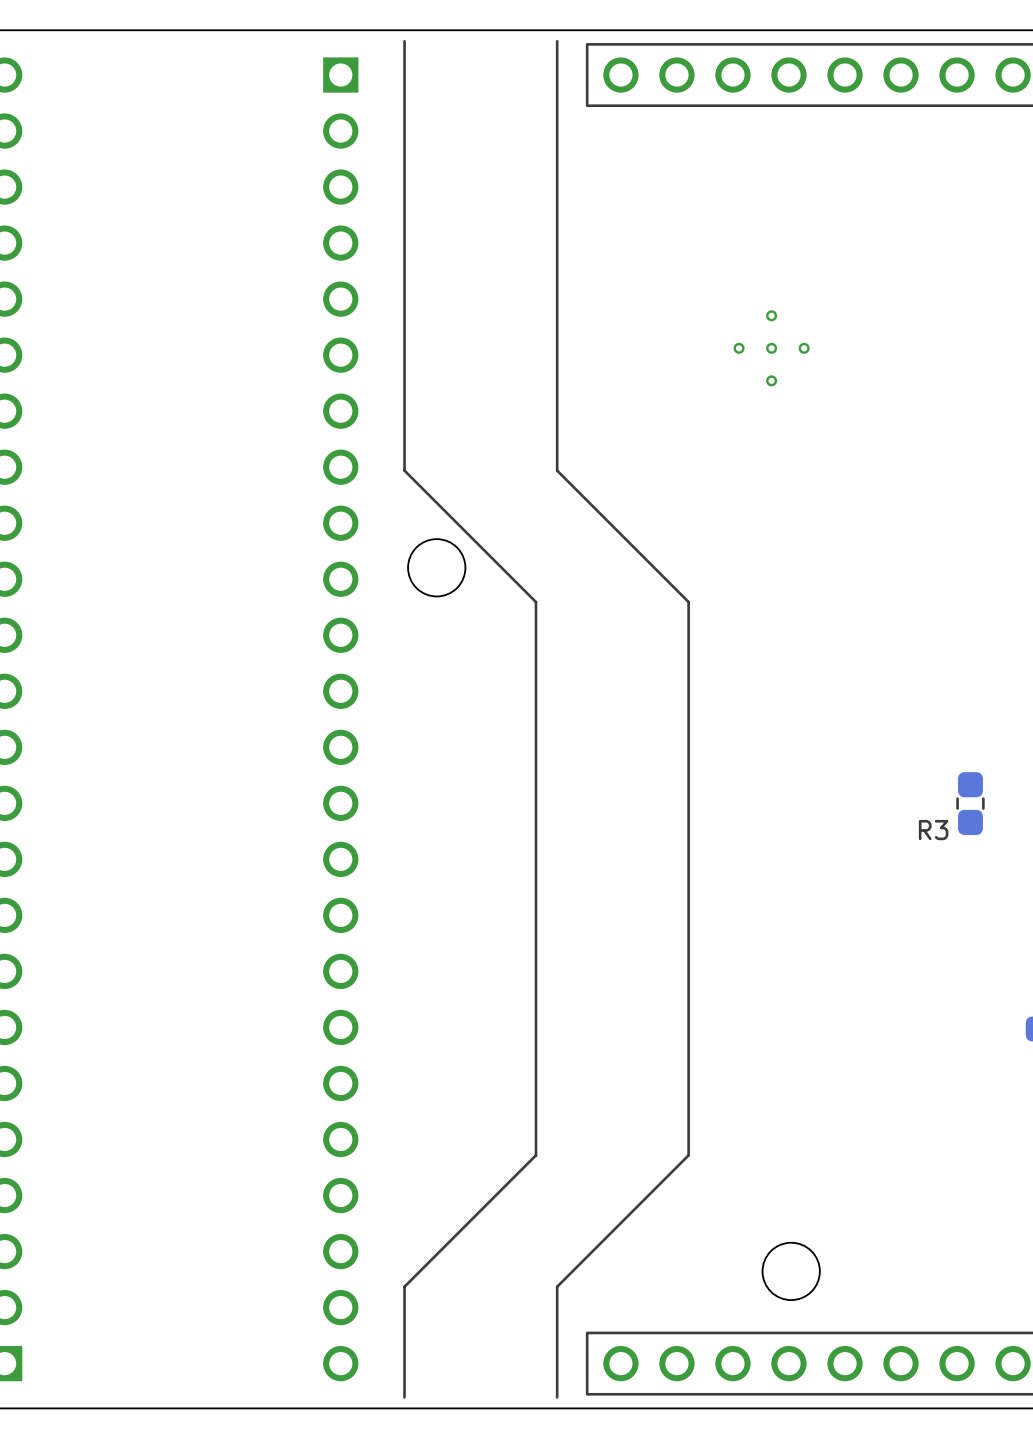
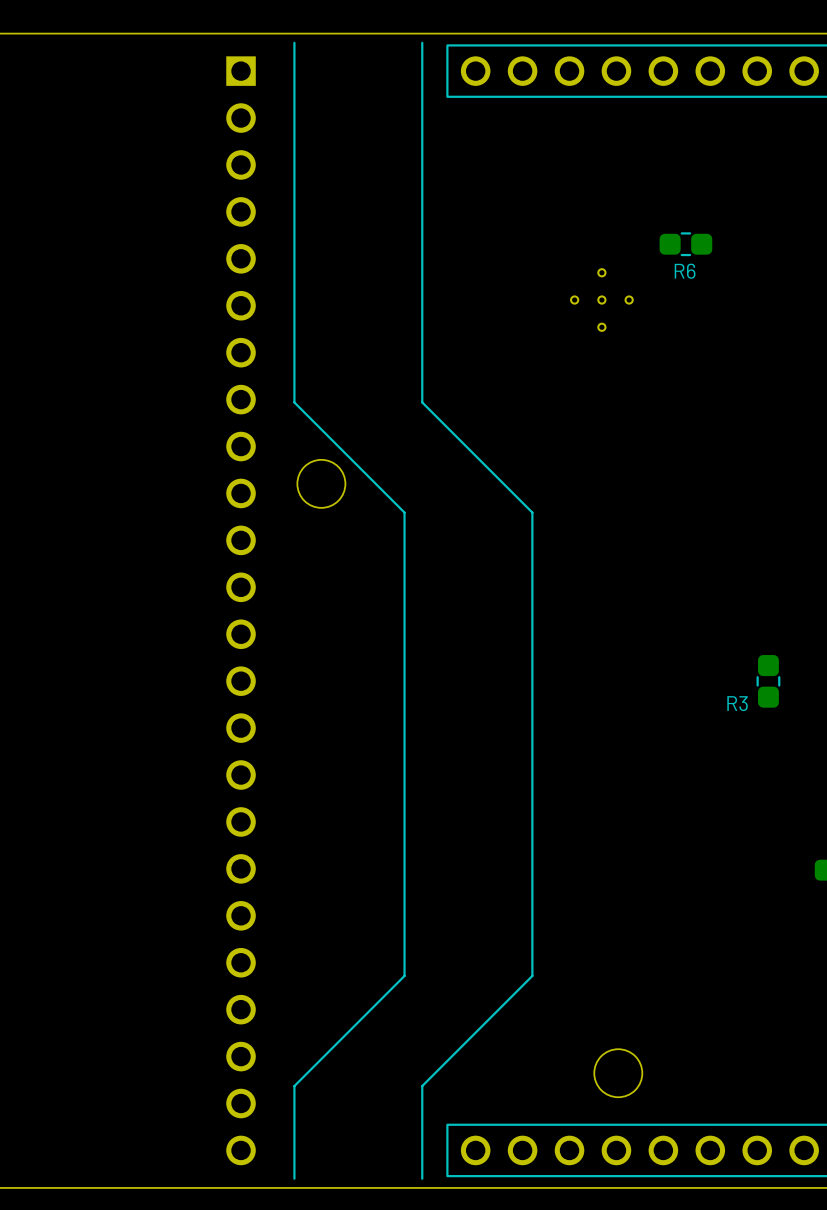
R6: none -> (685, 244)

